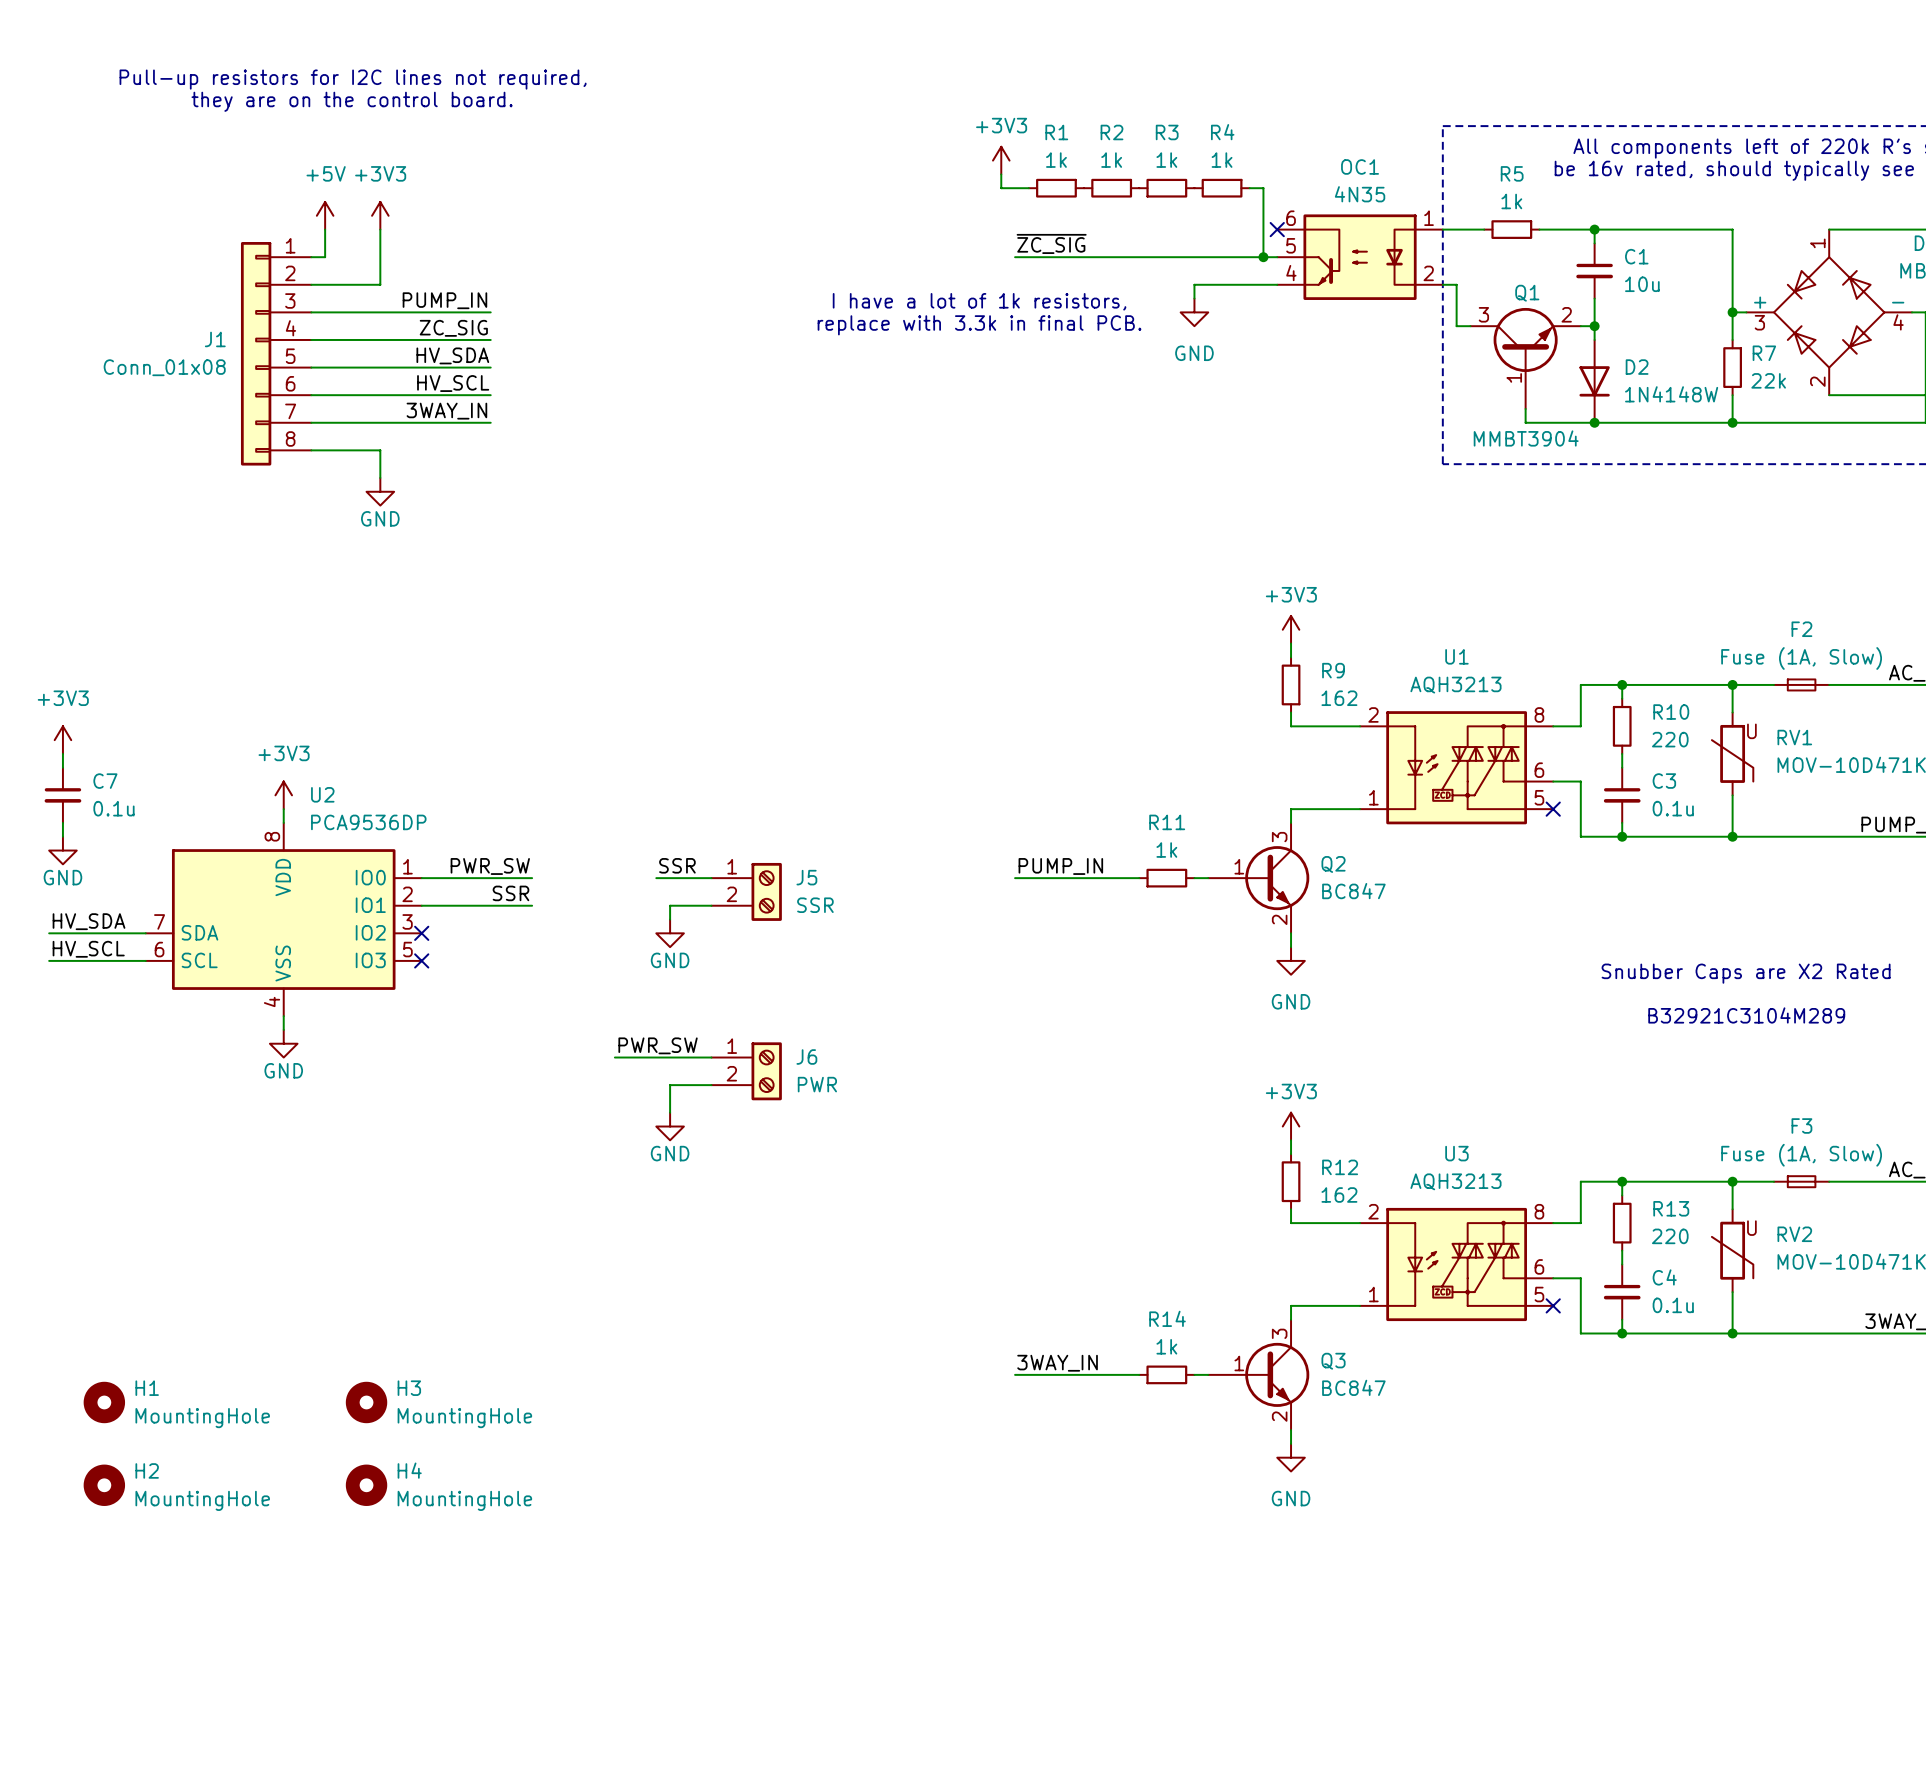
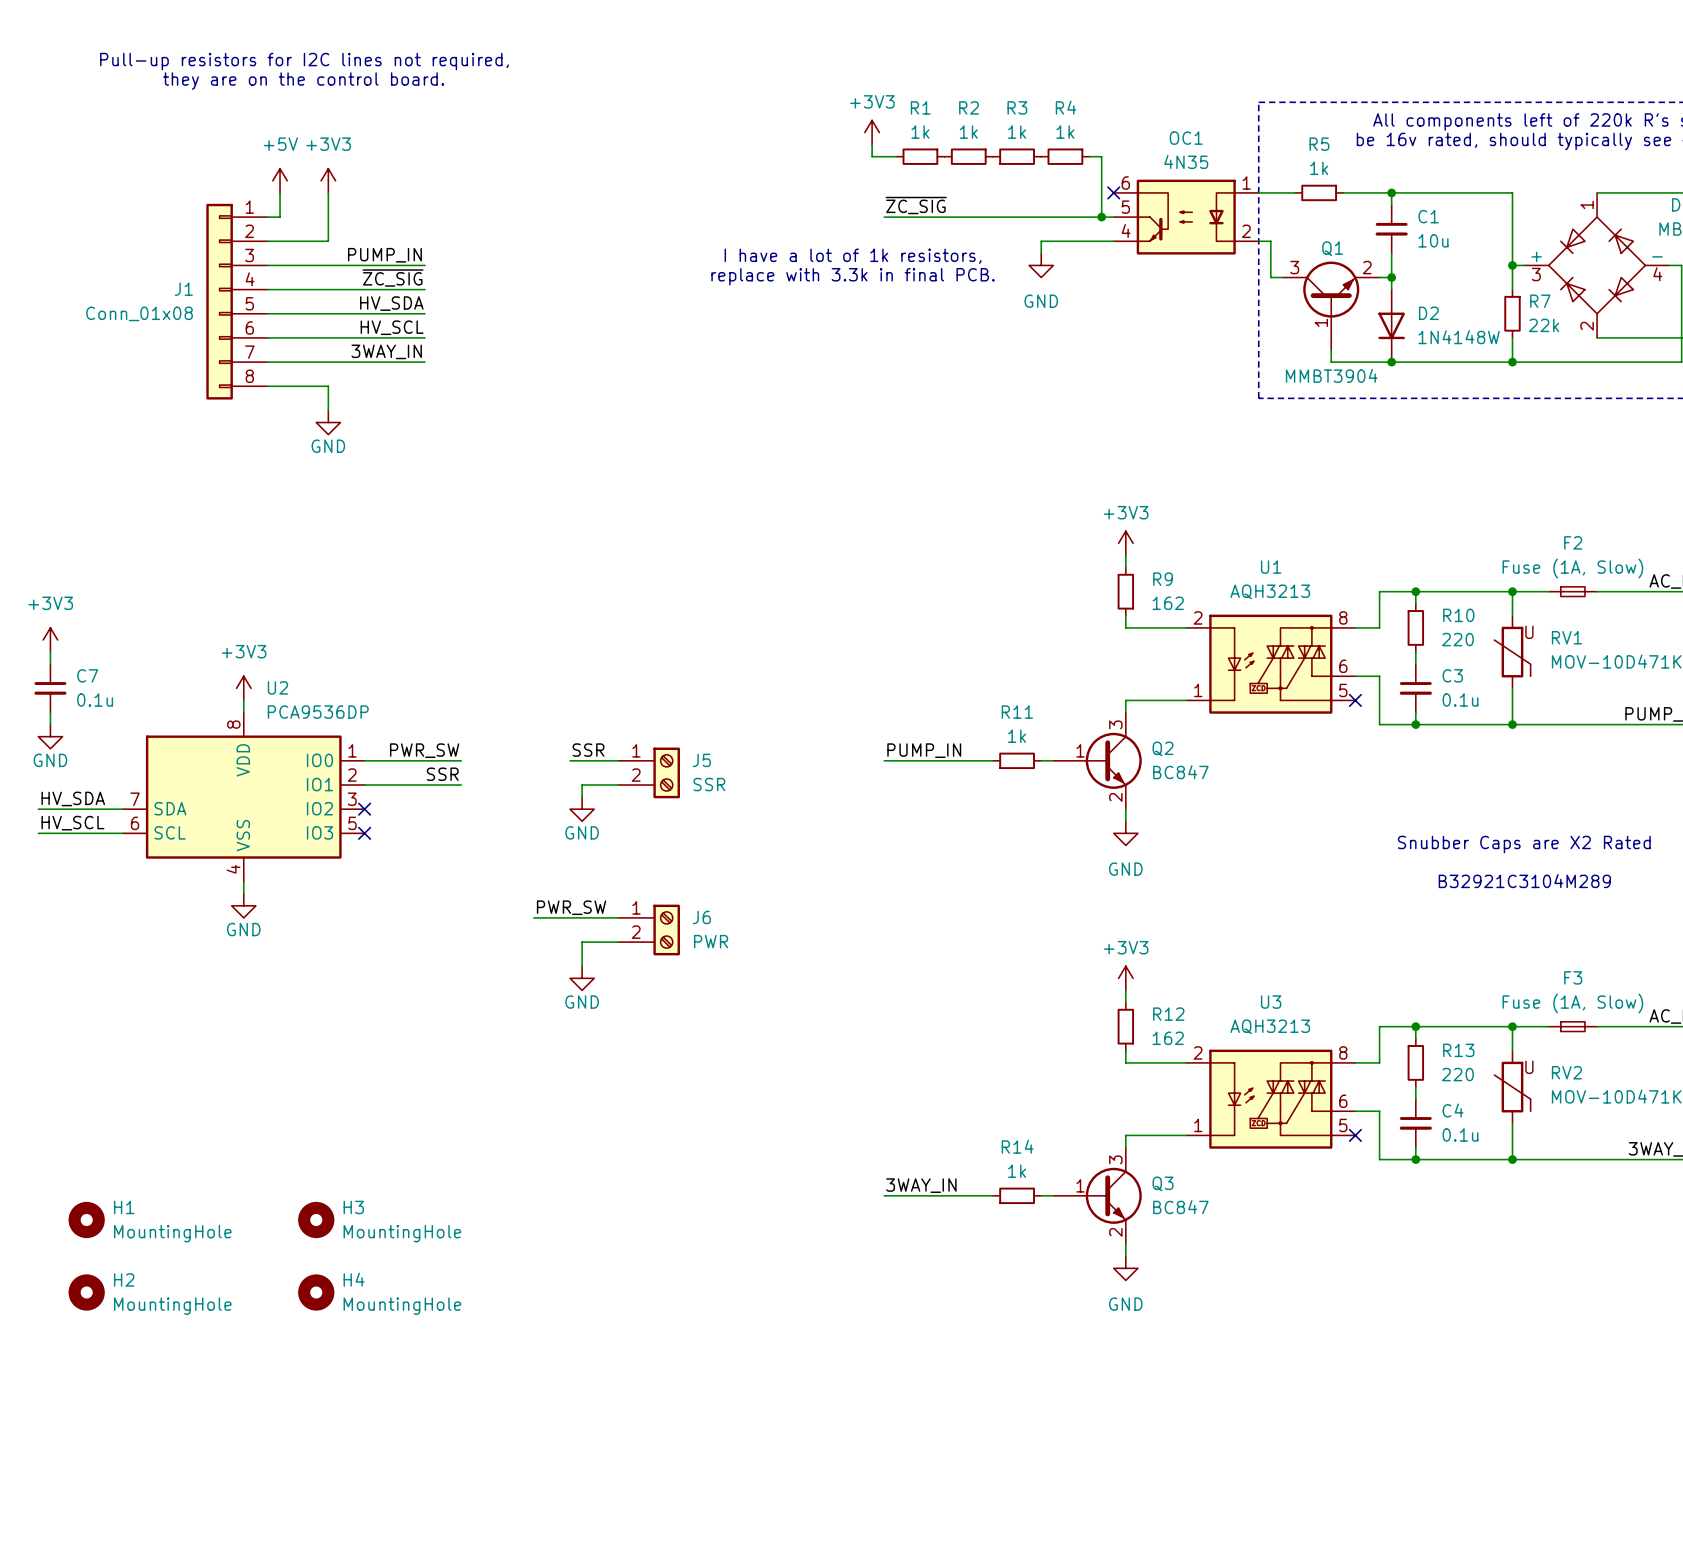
label: ZC_SIG (453, 328) -> ~{ZC_SIG} (392, 278)

